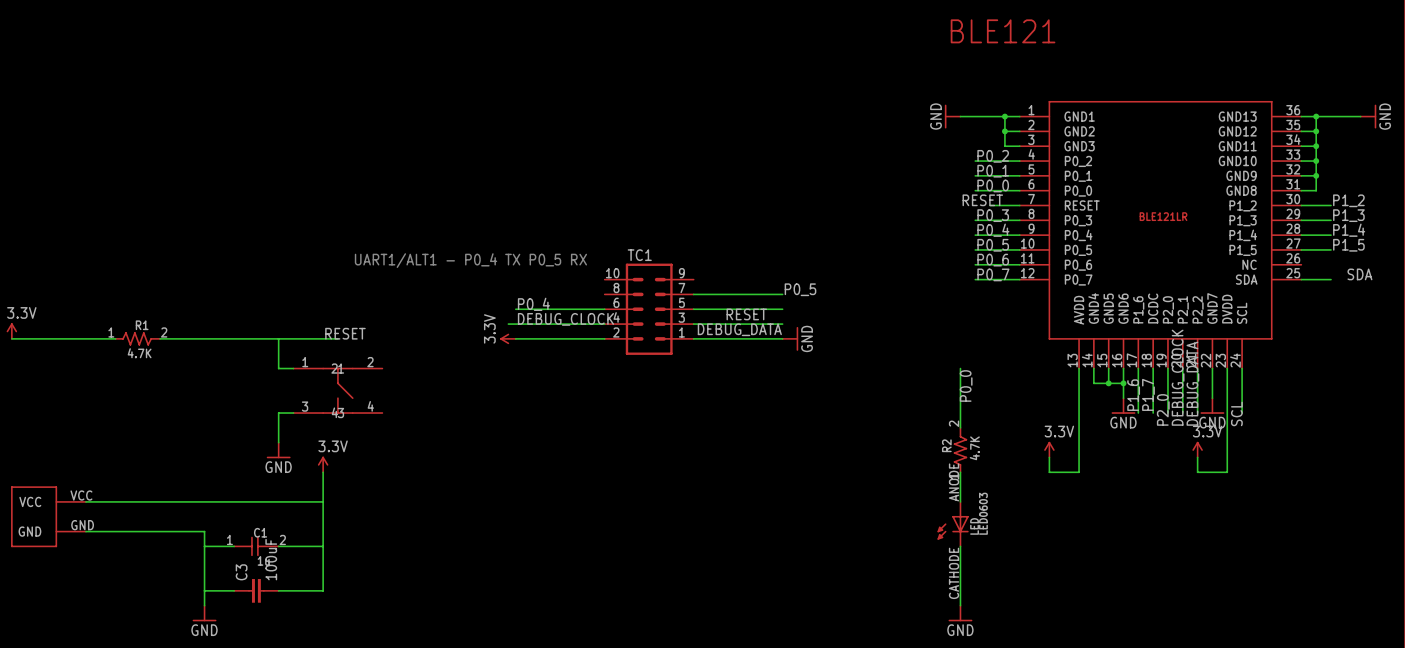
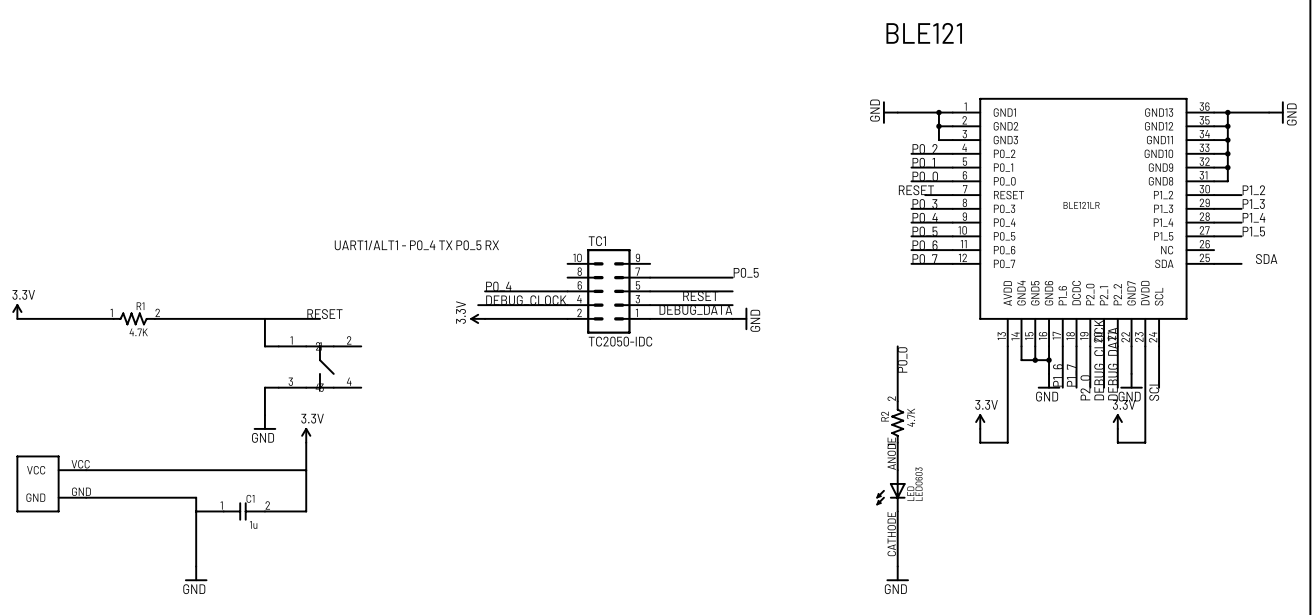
TC1 value: none -> TC2050-IDC (620, 341)
wire: (323, 546) (323, 590) (278, 590) -> none
wire: (204, 590) (234, 590) -> none
C3: 100uF (256, 590) -> none

